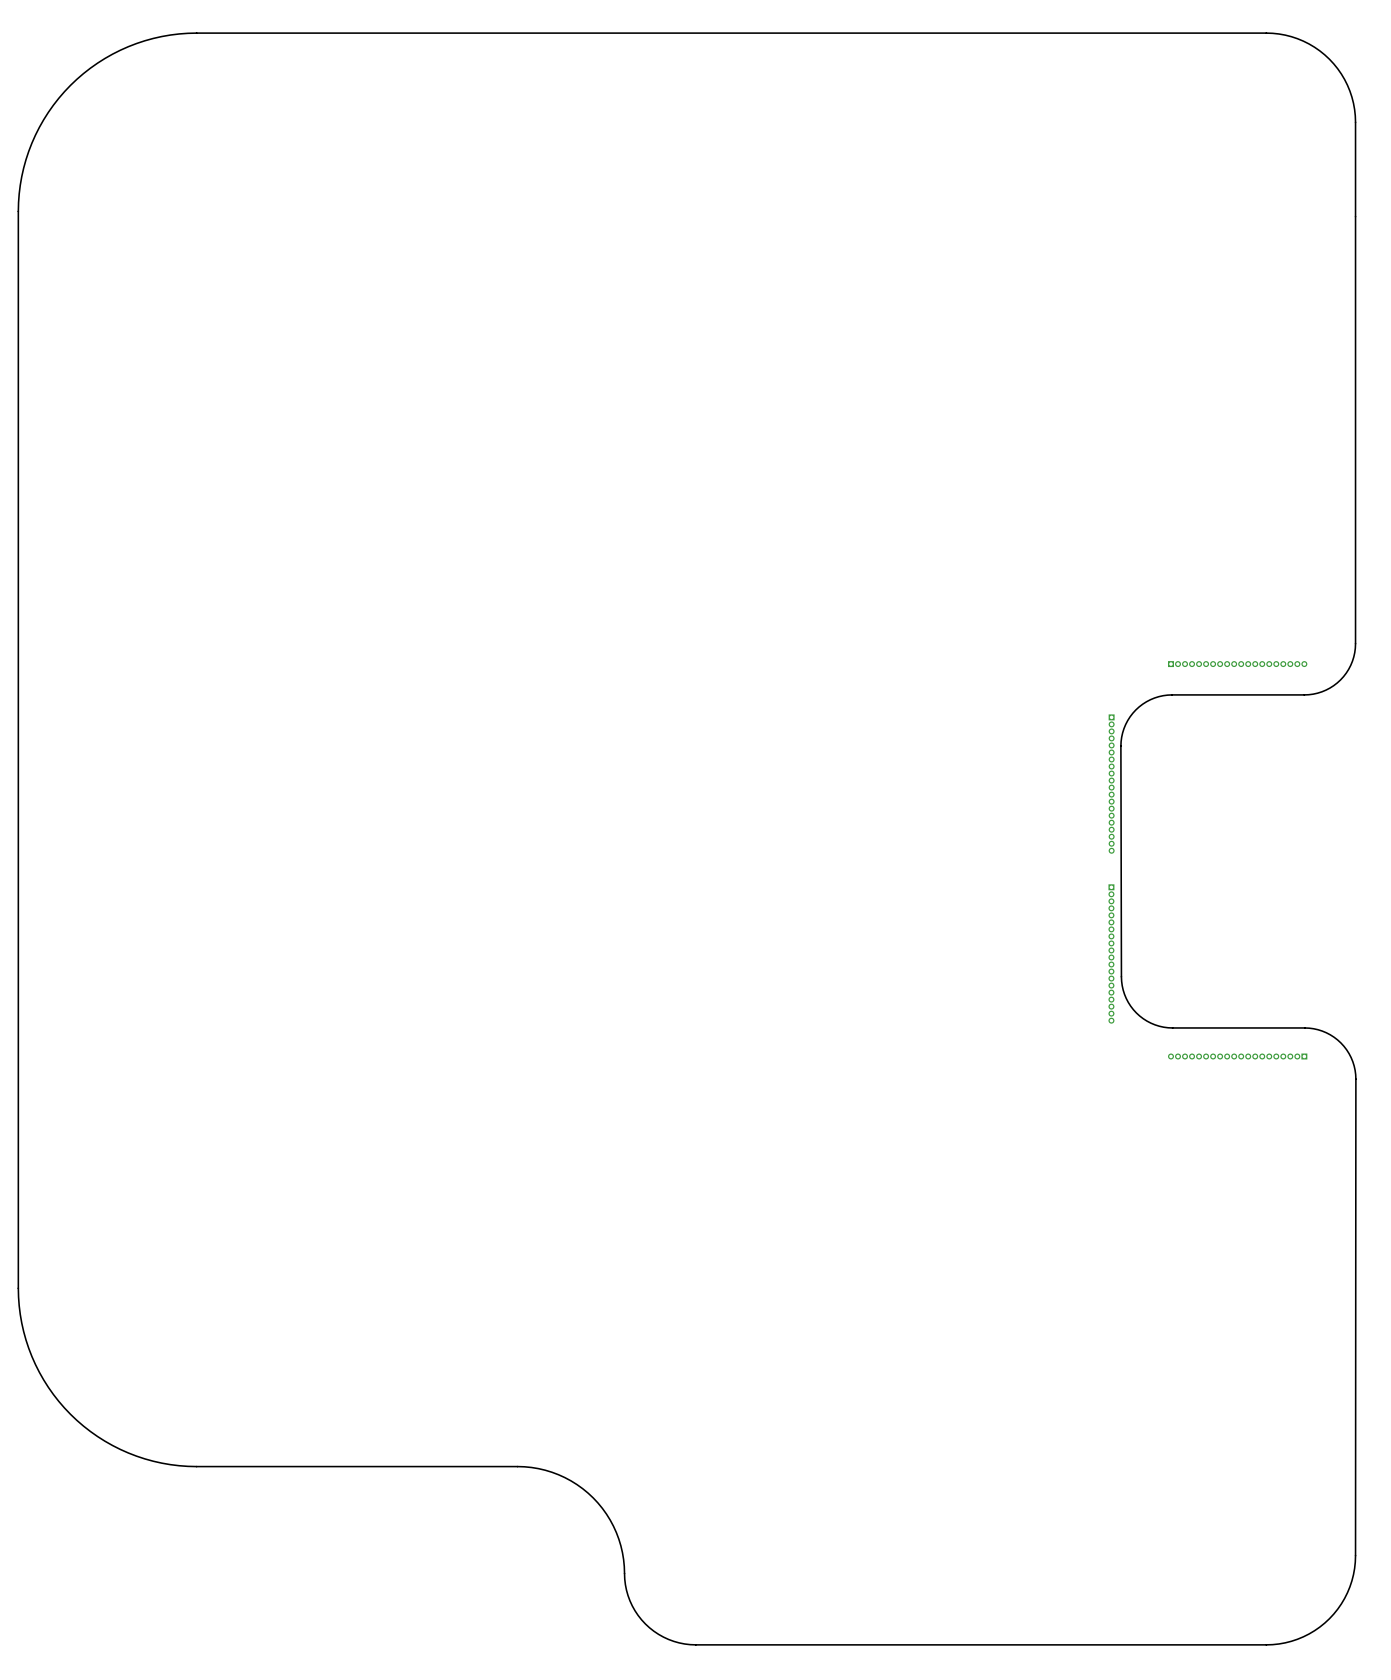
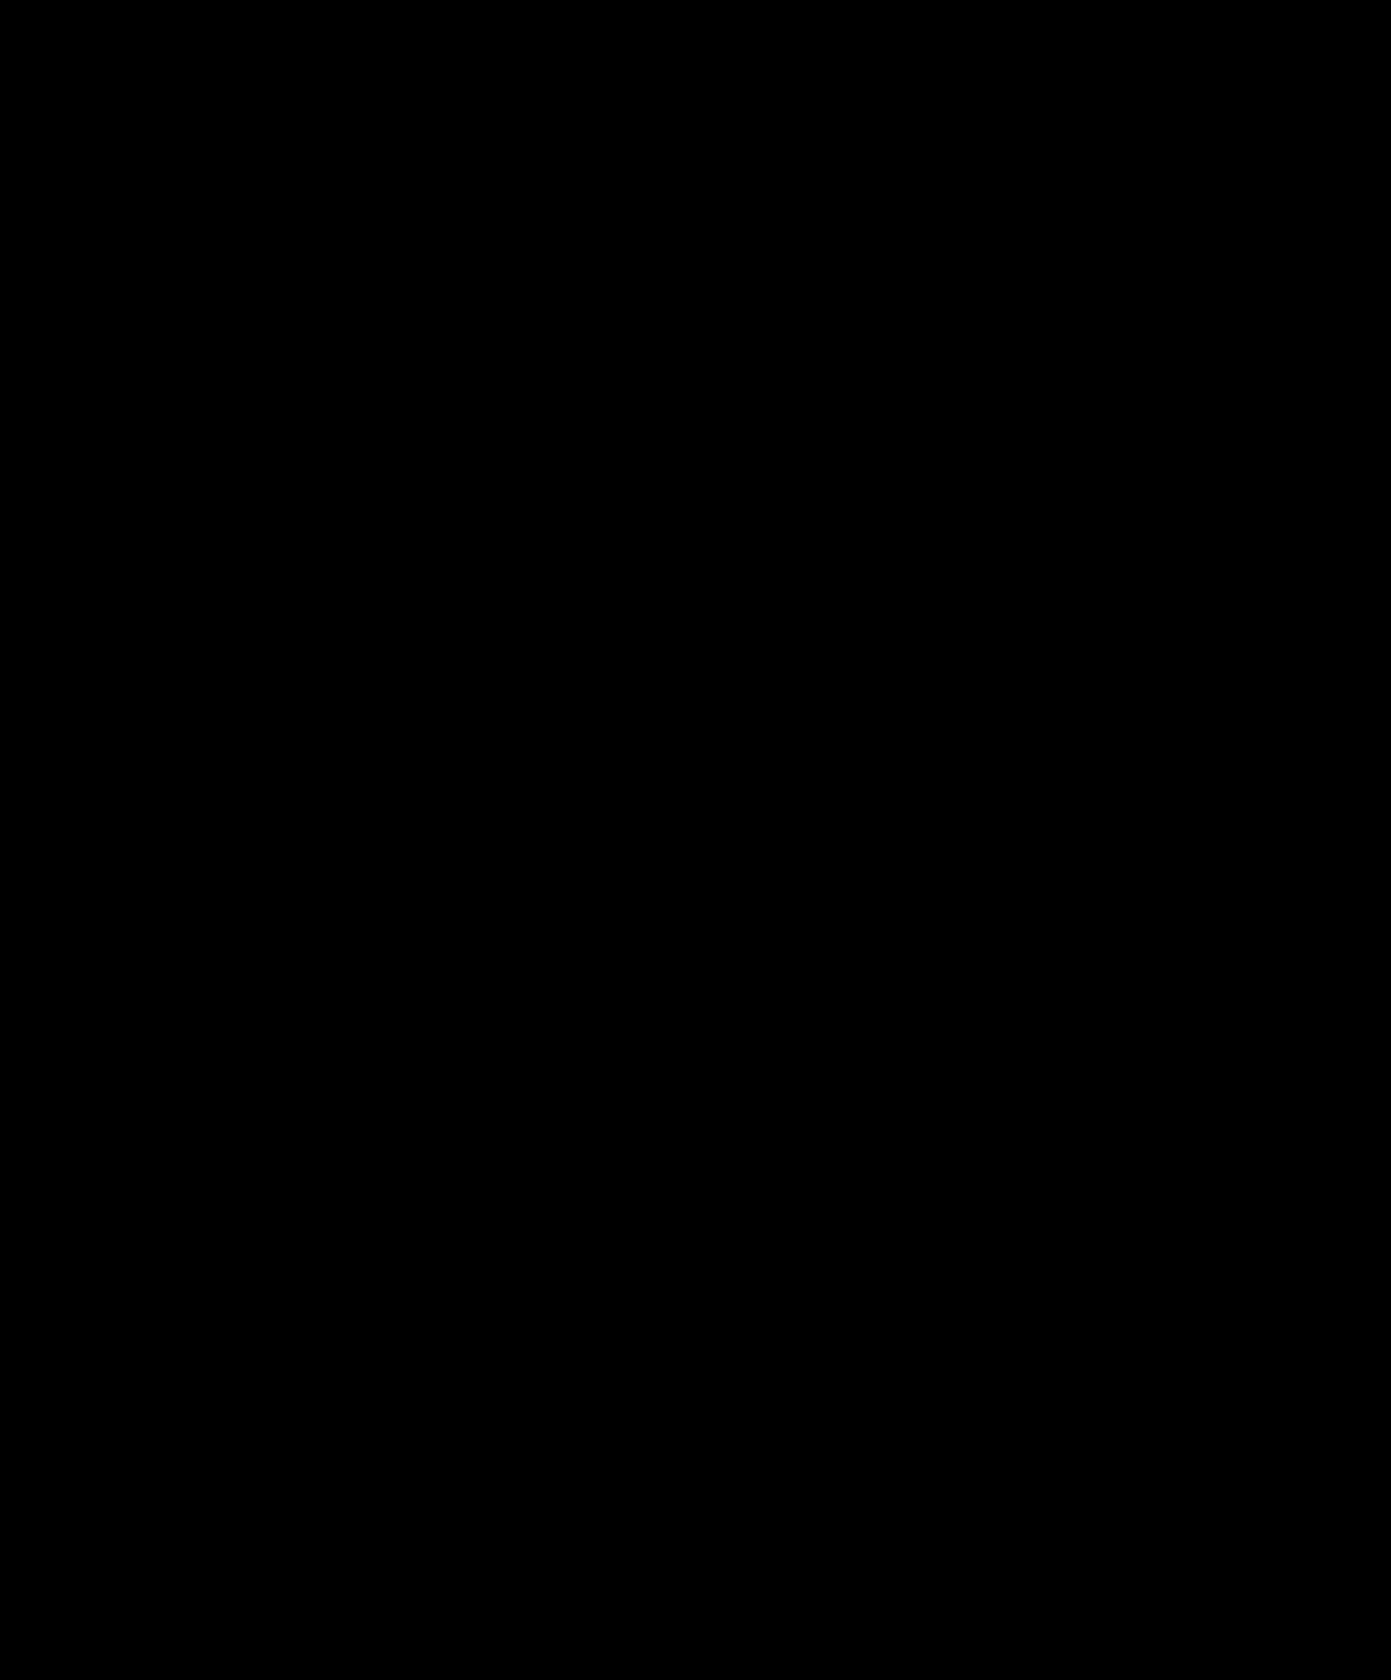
board edge: (1266, 33) (187, 33) (153, 38) (120, 50) (83, 73) (58, 98) (43, 119) (28, 151) (21, 176) (18, 202) (18, 1288) (23, 1331) (35, 1364) (58, 1401) (83, 1426) (104, 1441) (128, 1453) (153, 1461) (179, 1465) (517, 1466) (551, 1472) (582, 1488) (597, 1503) (610, 1520) (620, 1545) (628, 1595) (638, 1615) (658, 1634) (684, 1643) (1272, 1644) (1303, 1636) (1319, 1627) (1333, 1614) (1349, 1586) (1355, 1555) (1355, 1079) (1352, 1061) (1346, 1049) (1337, 1039) (1326, 1032) (1313, 1028) (1172, 1027) (1155, 1024) (1143, 1018) (1130, 1006) (1123, 990) (1121, 976) (1120, 746) (1122, 732) (1130, 716) (1146, 701) (1167, 695) (1304, 694) (1317, 693) (1333, 685) (1343, 676) (1350, 665) (1354, 652) (1354, 109) (1344, 79) (1324, 54) (1297, 38) (1266, 33) -> none
part: (1237, 664) -> none
part: (1111, 784) -> none
part: (1111, 953) -> none
part: (1237, 1056) -> none

